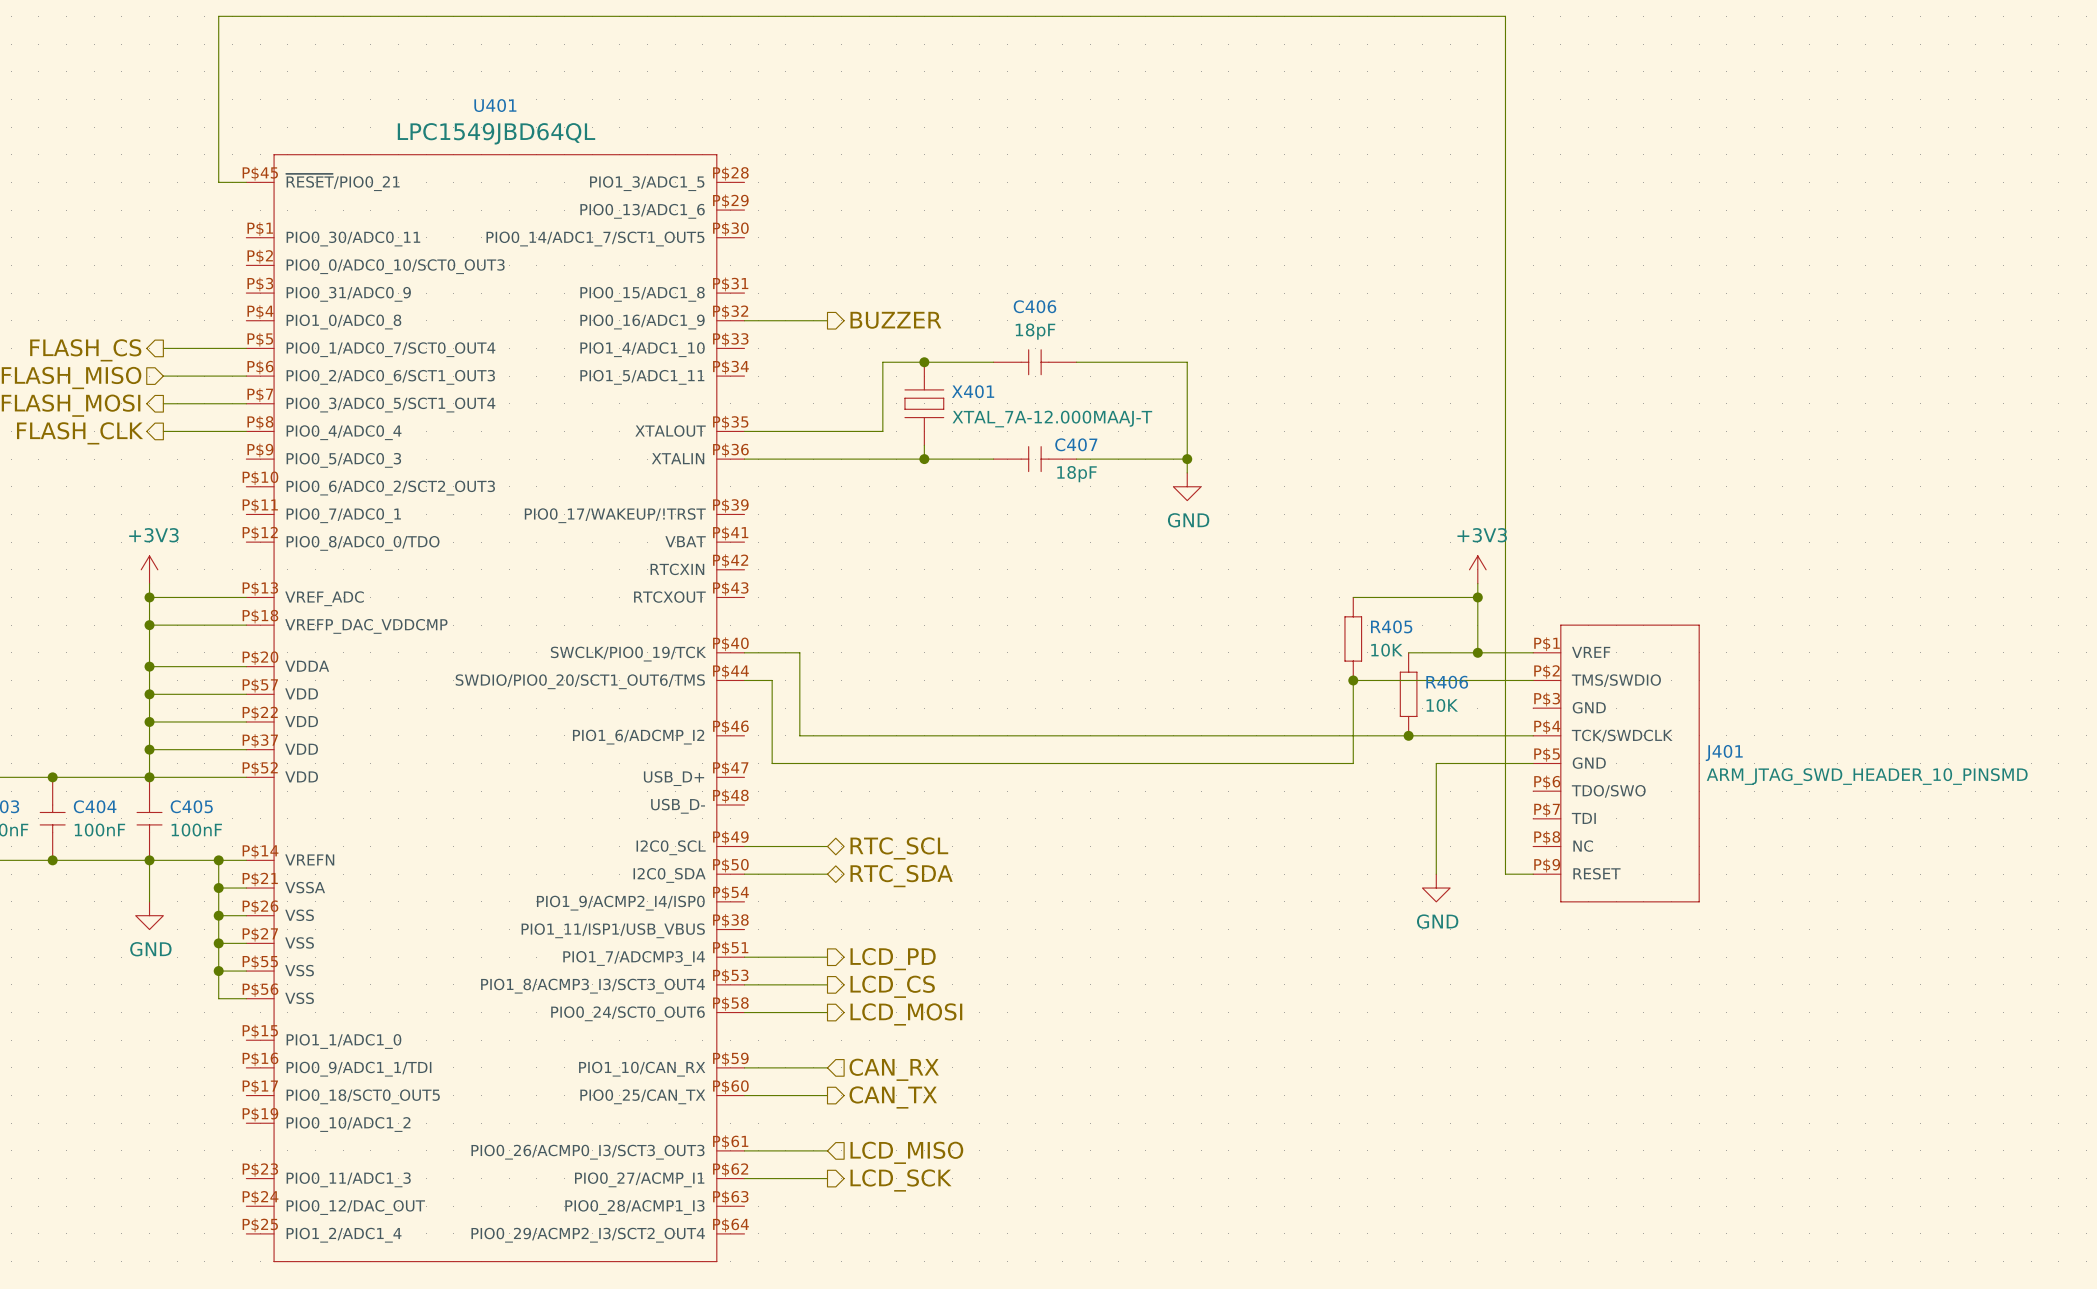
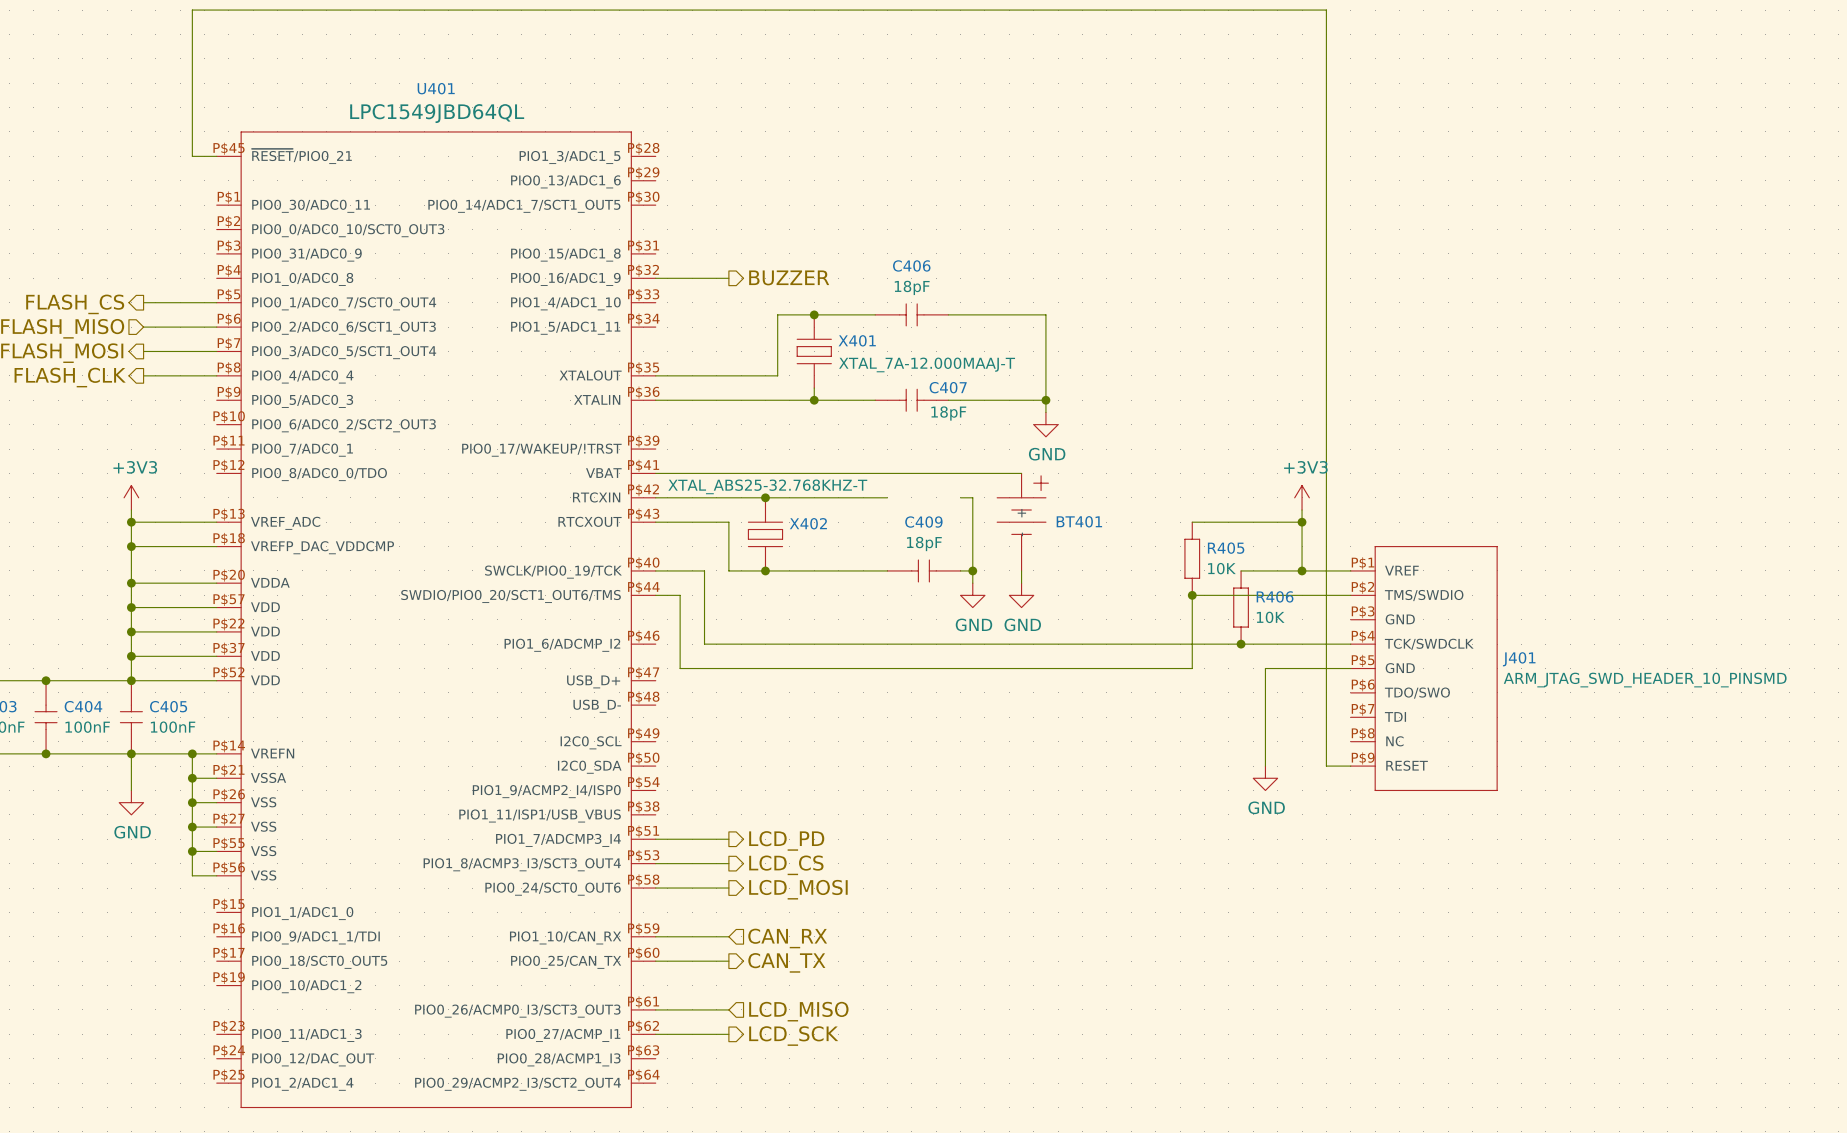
wire: none -> (655, 473) (1021, 473)
wire: none -> (655, 497) (887, 497)
junction: none -> (765, 497)
wire: none -> (960, 497) (972, 497) (972, 583)
wire: none -> (655, 522) (728, 522) (728, 570) (887, 570)
BT401: none -> (1022, 522)
X402: none -> XTAL_ABS25-32.768KHZ-T (765, 534)
junction: none -> (765, 570)
C409: none -> 18pF (924, 570)
wire: none -> (960, 570) (972, 570)
junction: none -> (972, 570)
wire: none -> (1021, 570) (1021, 583)
power symbol: none -> GND (972, 595)
power symbol: none -> GND (1021, 595)
wire: (744, 846) (827, 846) -> none
hierarchical label: RTC_SCL (899, 848) -> none
wire: (744, 874) (827, 874) -> none
hierarchical label: RTC_SDA (901, 876) -> none

